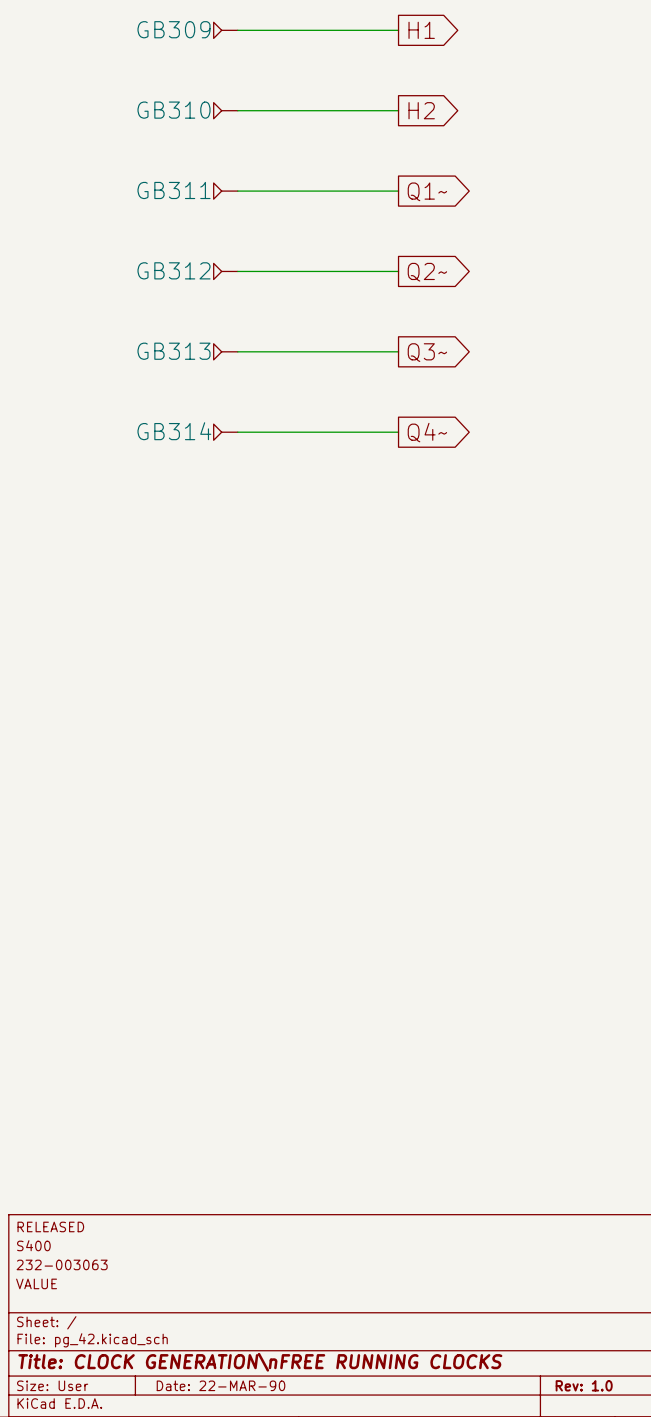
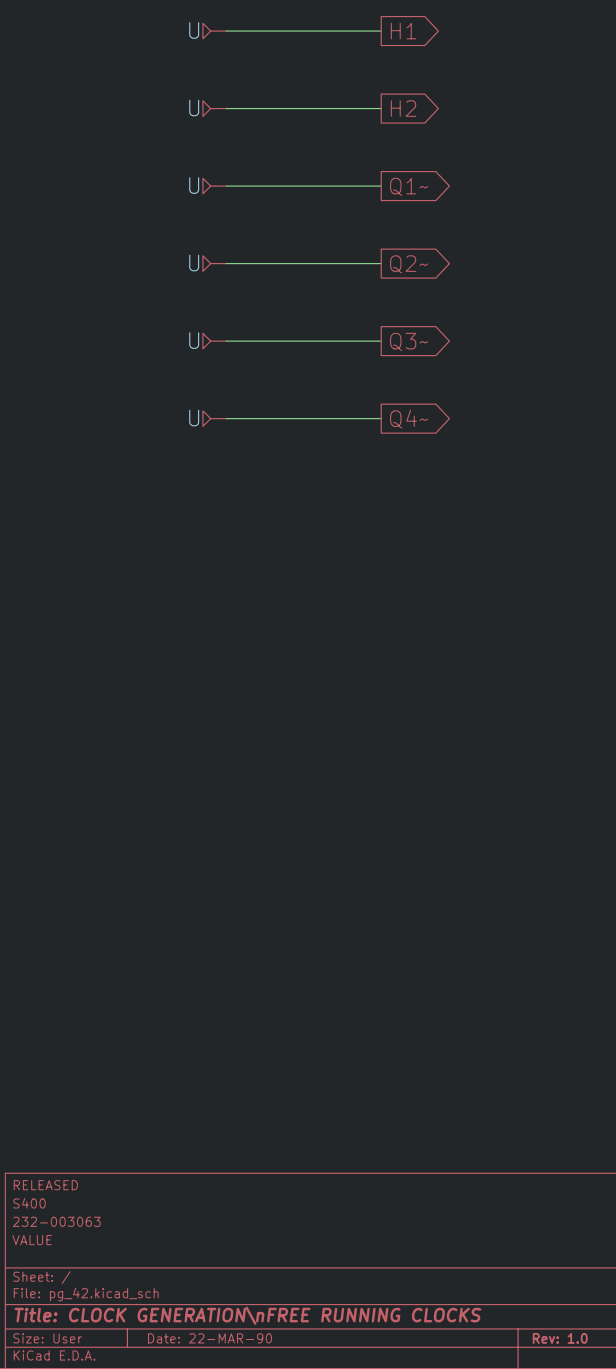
GB309 name: GB309 (174, 29) -> U (194, 30)
GB310 name: GB310 (174, 110) -> U (194, 107)
GB311 name: GB311 (174, 190) -> U (194, 185)
GB312 name: GB312 (174, 270) -> U (194, 263)
GB313 name: GB313 (174, 351) -> U (194, 340)
GB314 name: GB314 (174, 431) -> U (194, 418)

